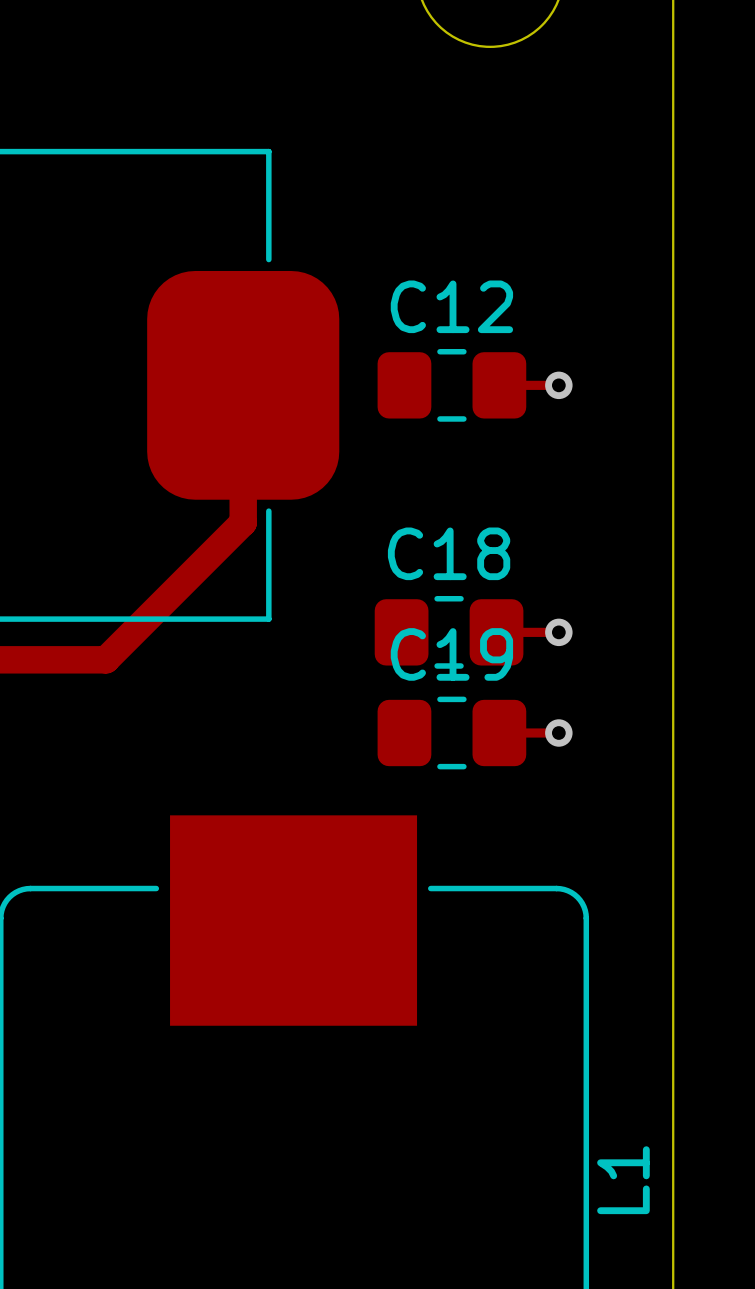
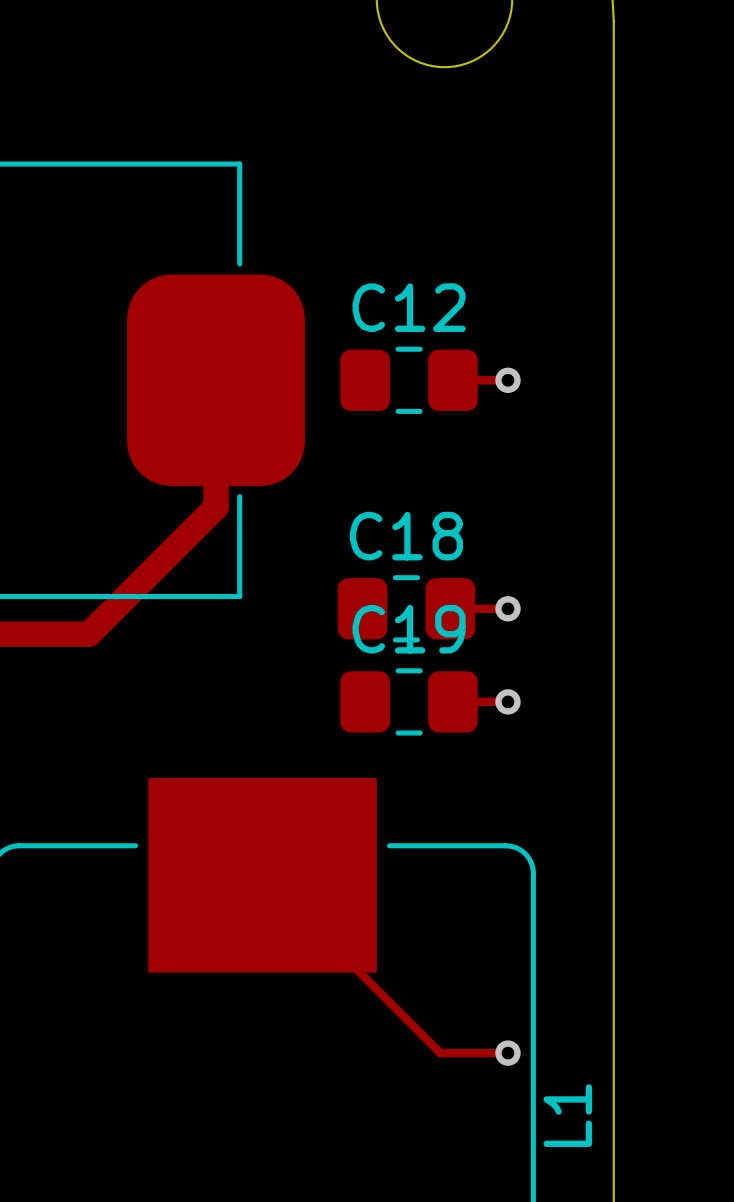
track: none -> (262, 875) (440, 1053) (507, 1053)
via: none -> (507, 1053)

